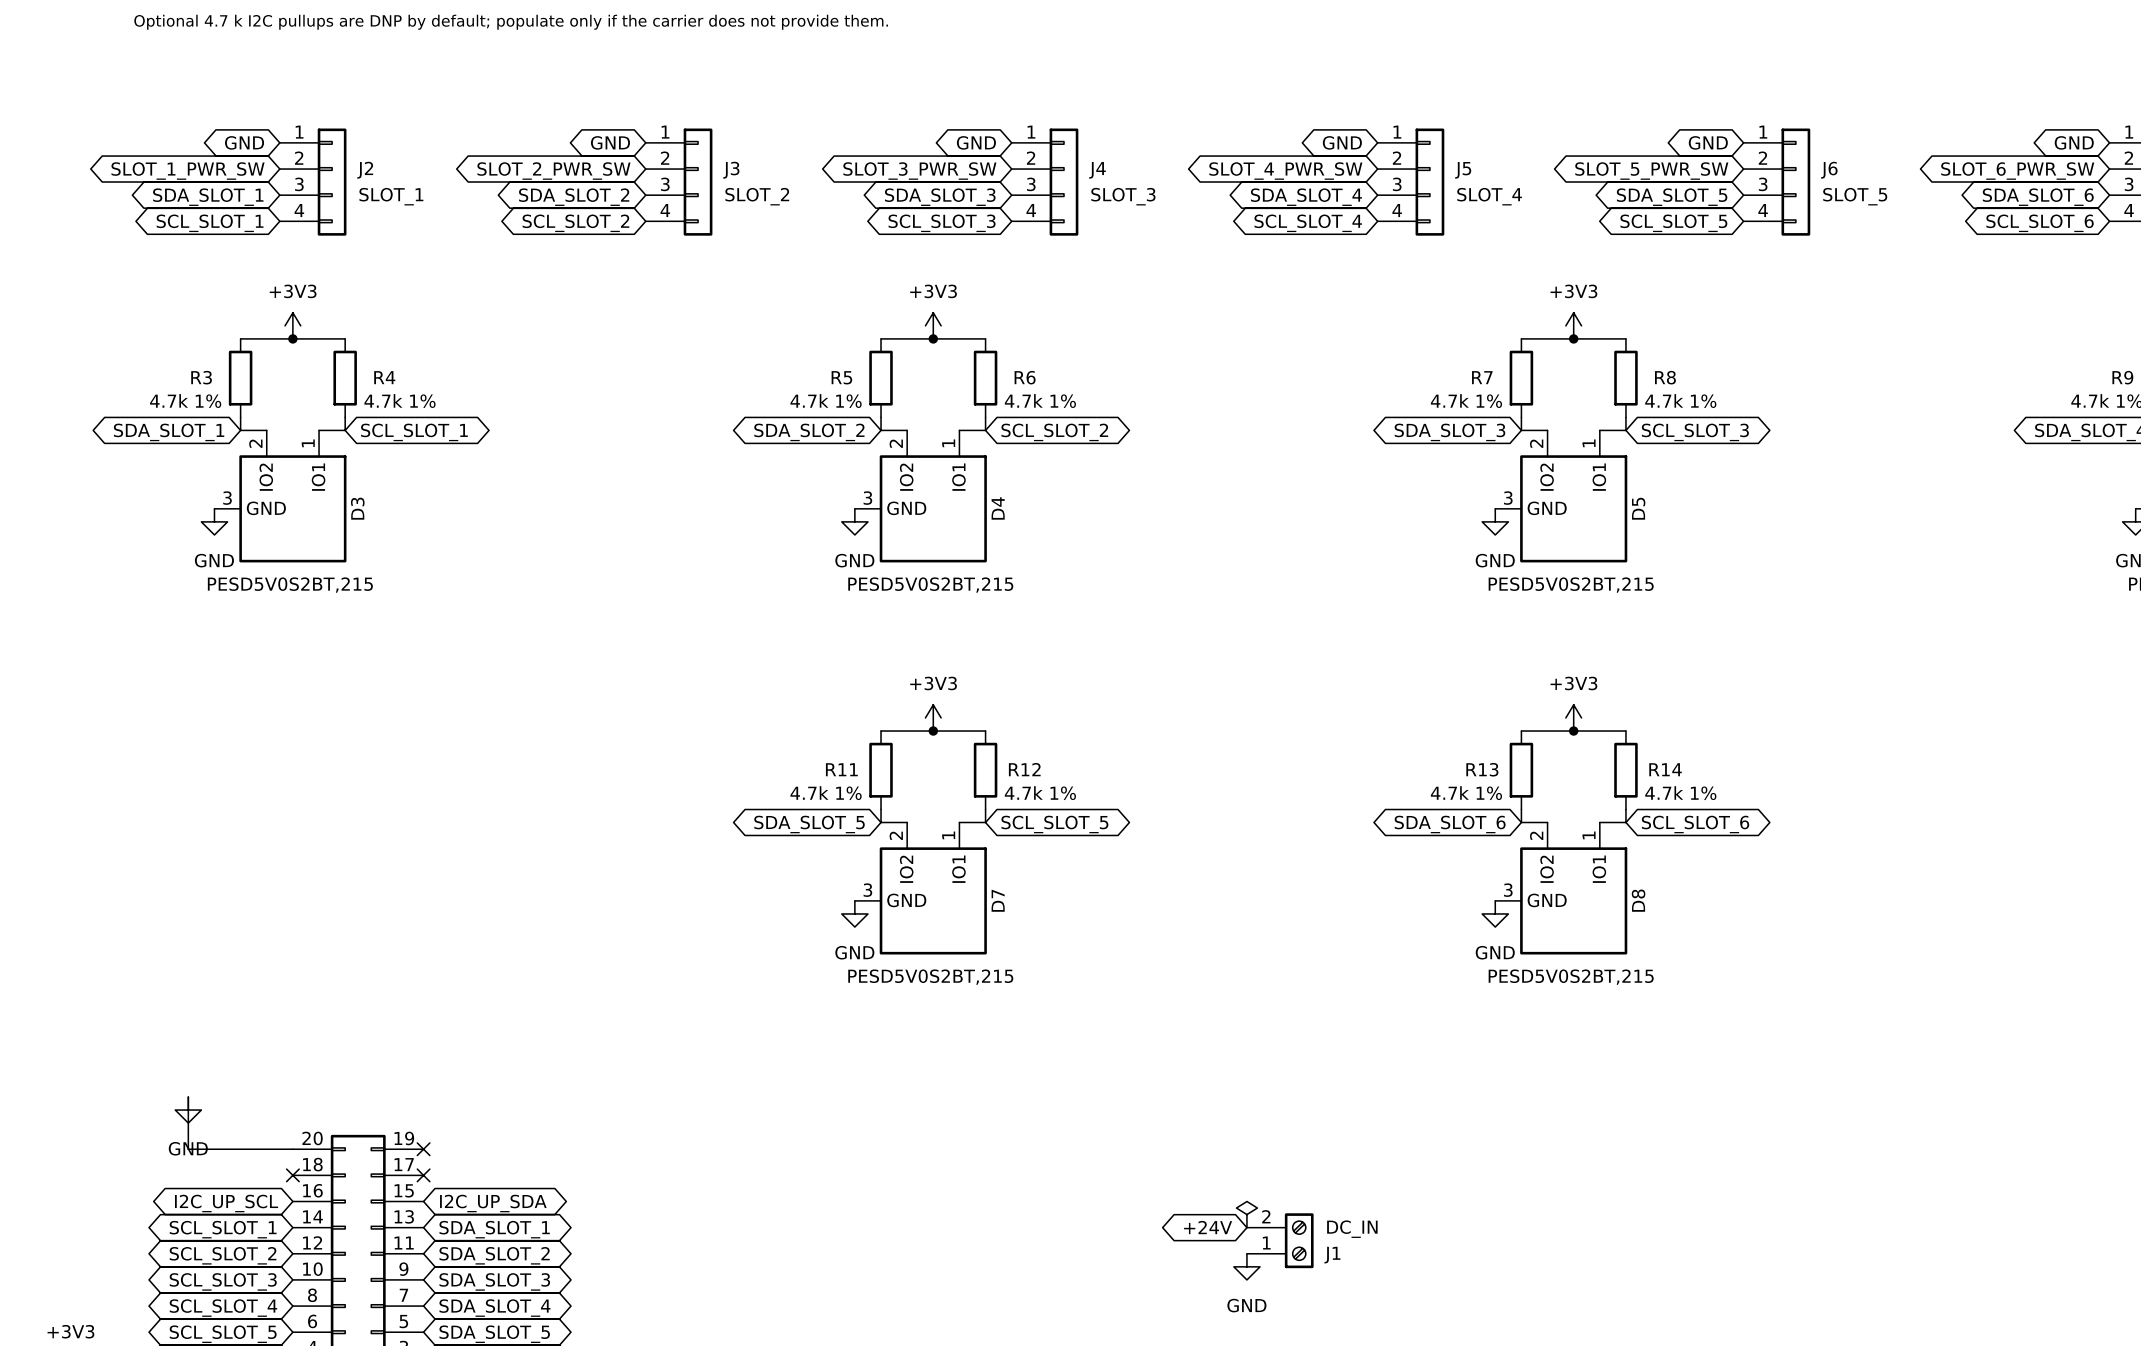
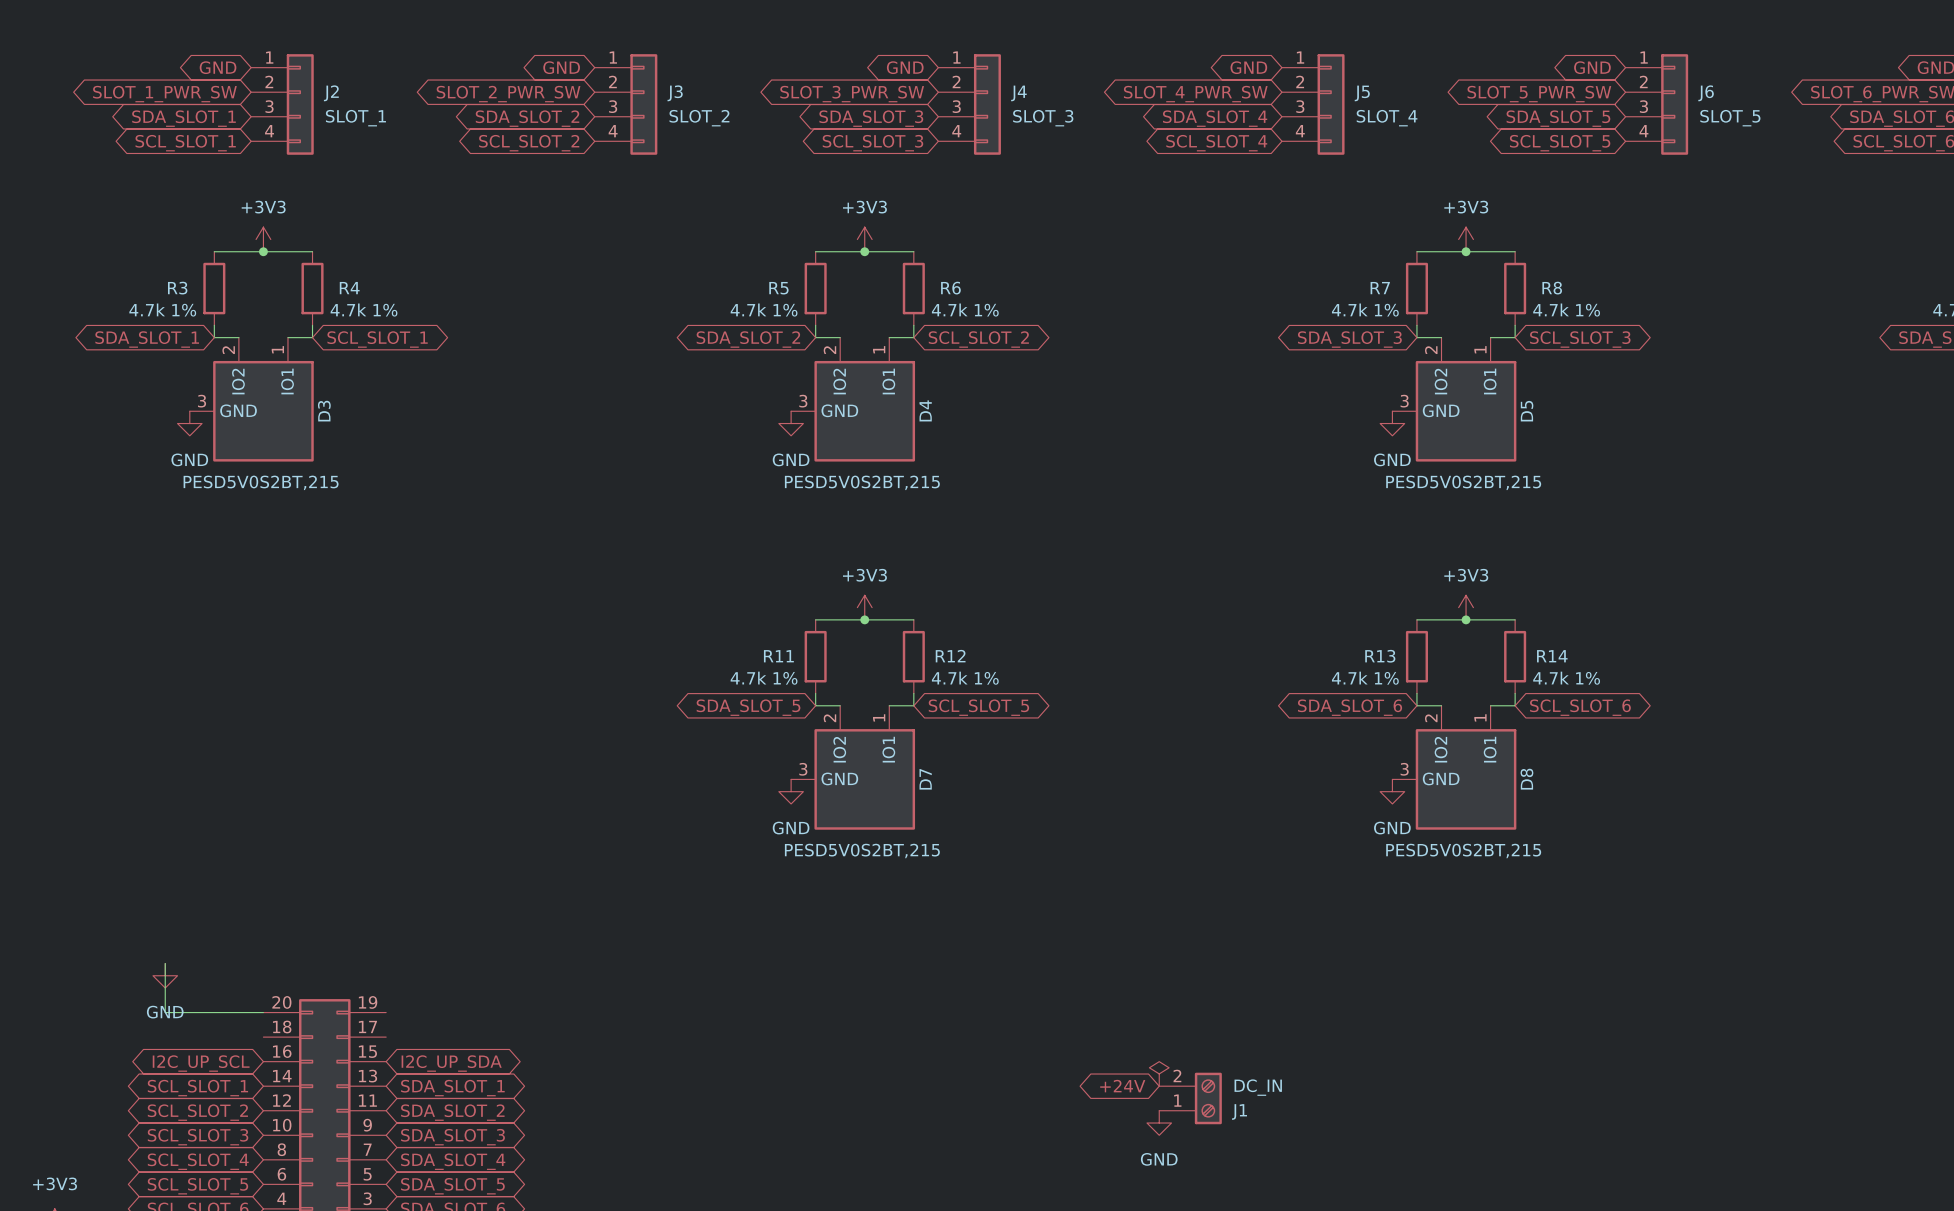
no-connect mark: (423, 1149) -> none
no-connect mark: (292, 1175) -> none
no-connect mark: (423, 1175) -> none

